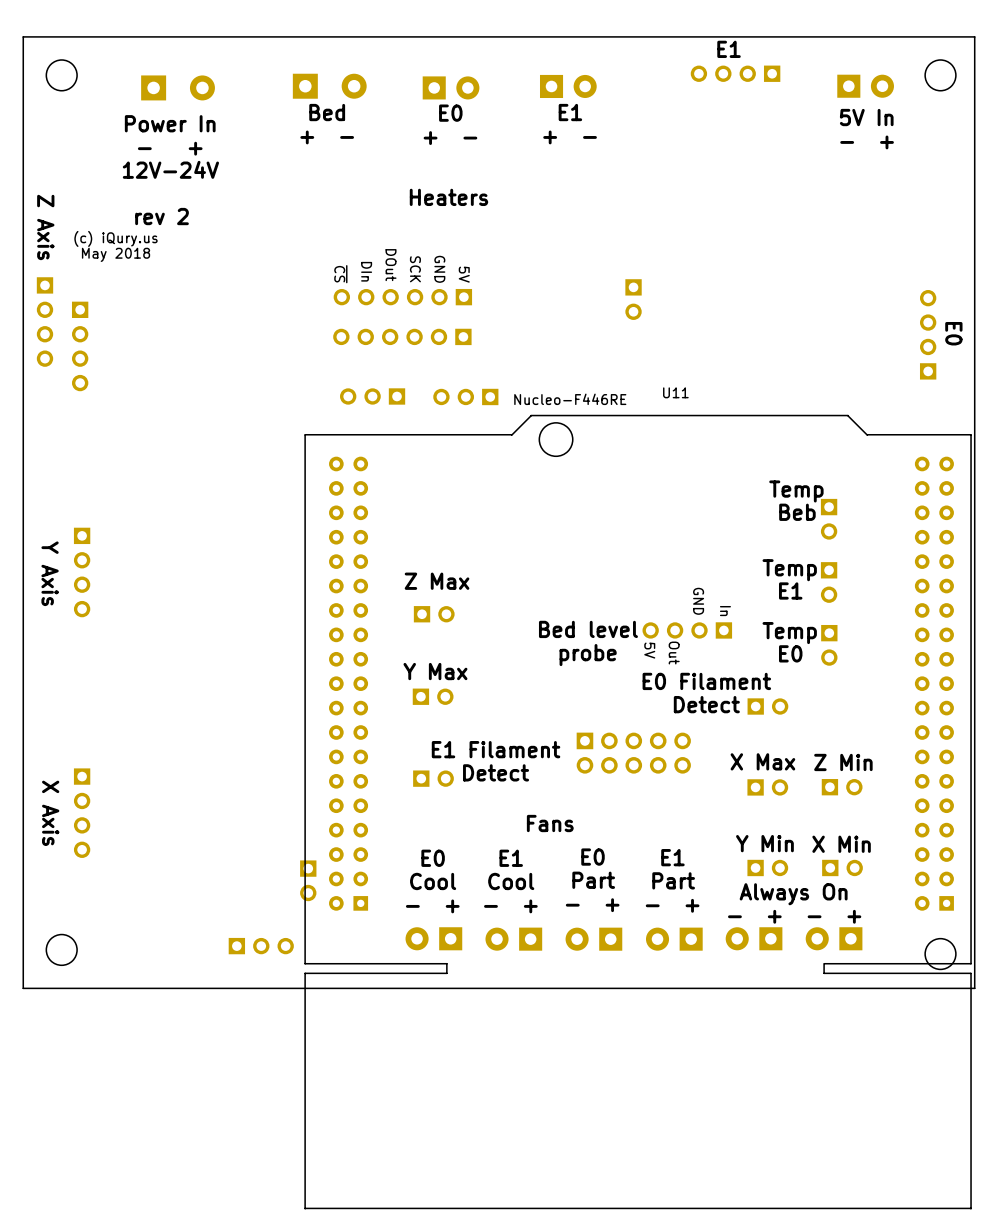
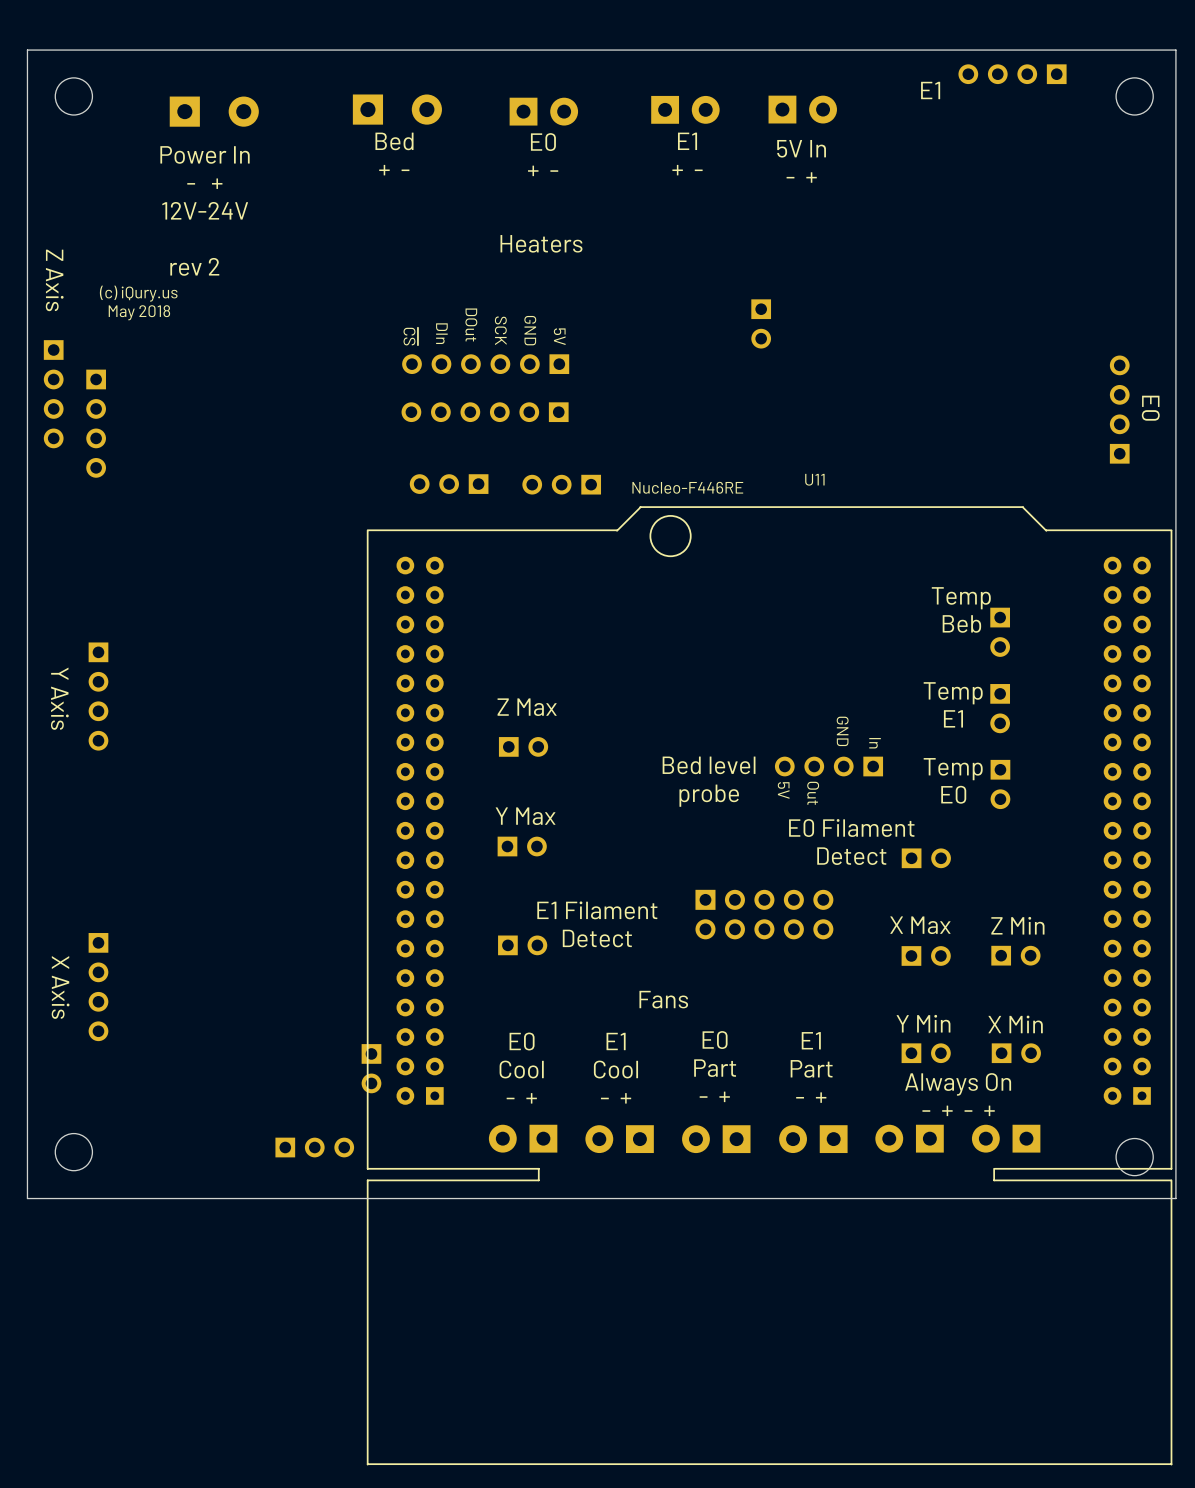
text position: E1 (729, 49) -> E1 (930, 90)
part position: (735, 73) -> (1012, 74)
part position: (865, 86) -> (802, 109)
text position: 5V In (866, 117) -> 5V In (801, 148)
text position: - + (867, 142) -> - + (801, 177)
part position: (633, 299) -> (761, 323)

